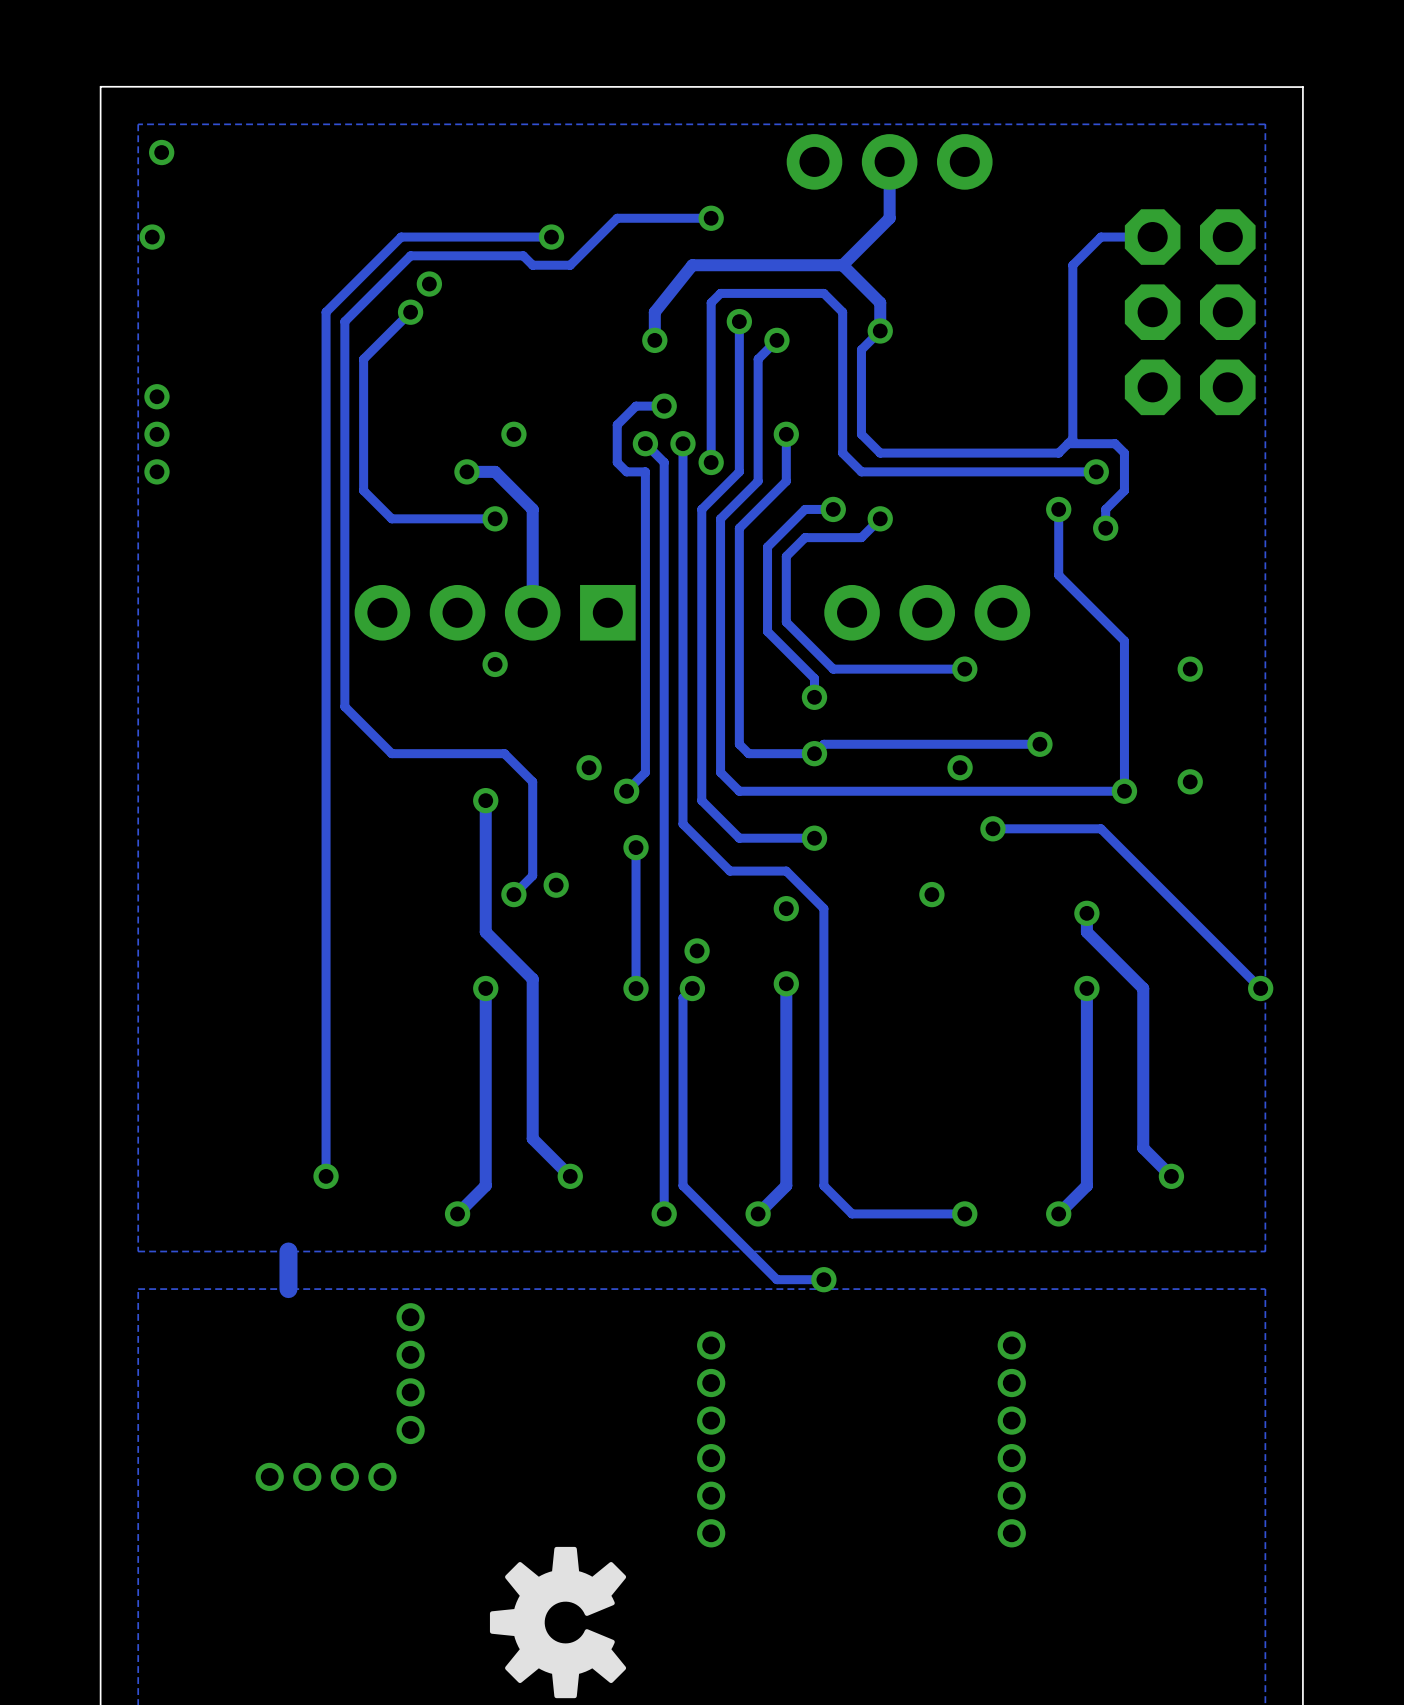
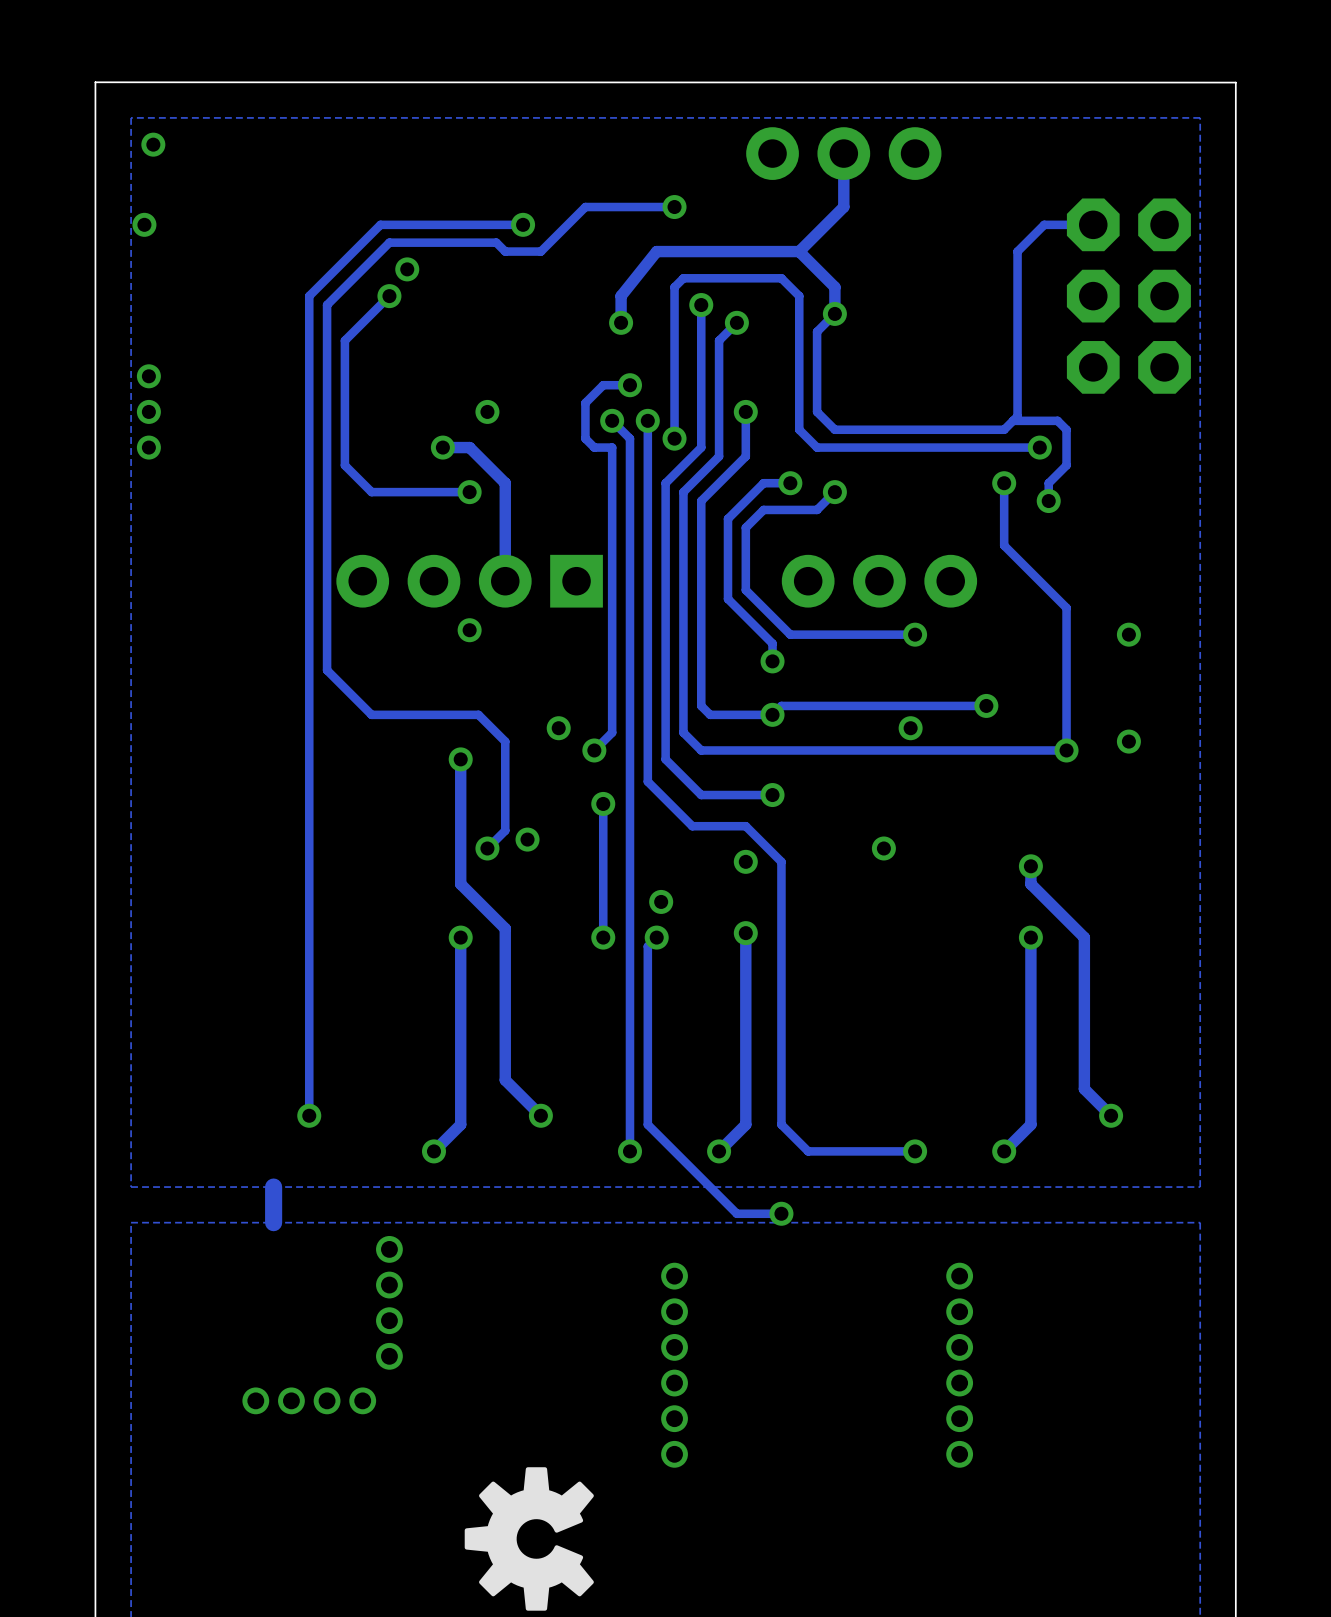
track: (992, 828) (1100, 828) (1260, 988) -> none
via: (992, 828) -> none
via: (1260, 988) -> none

